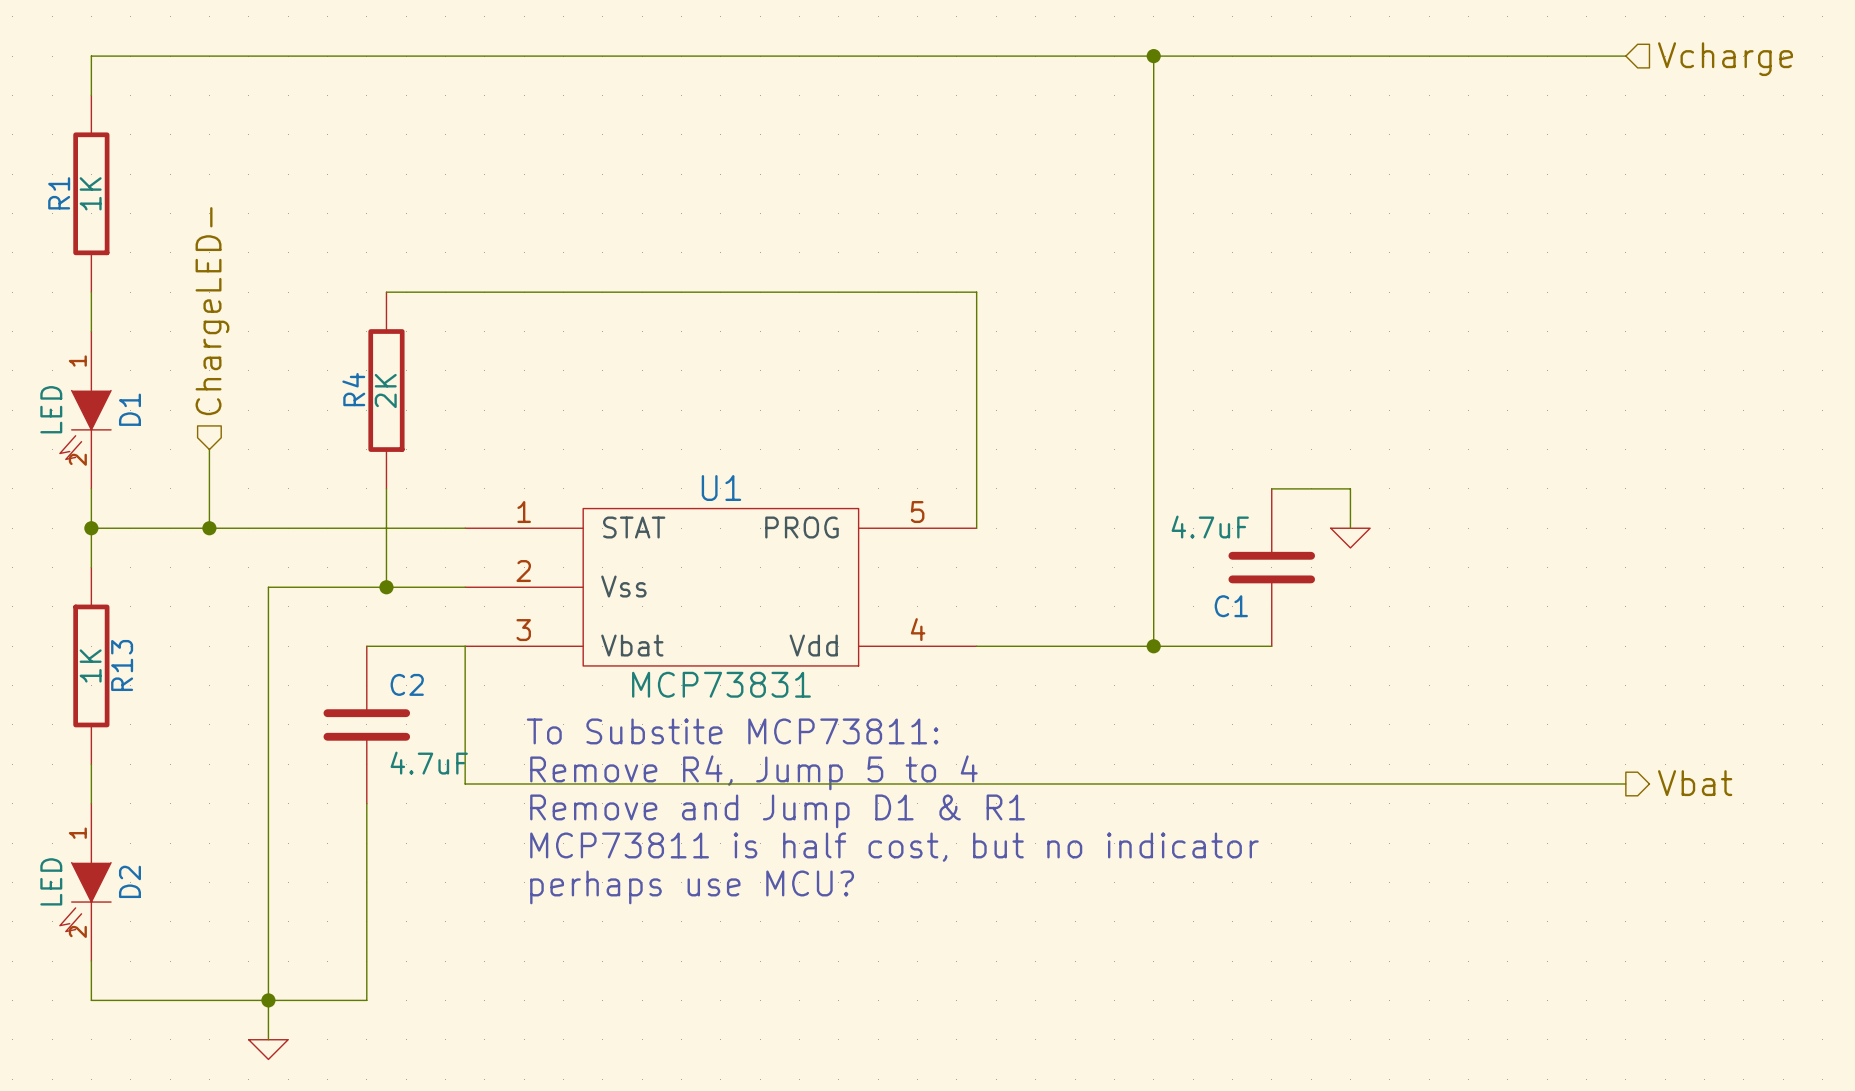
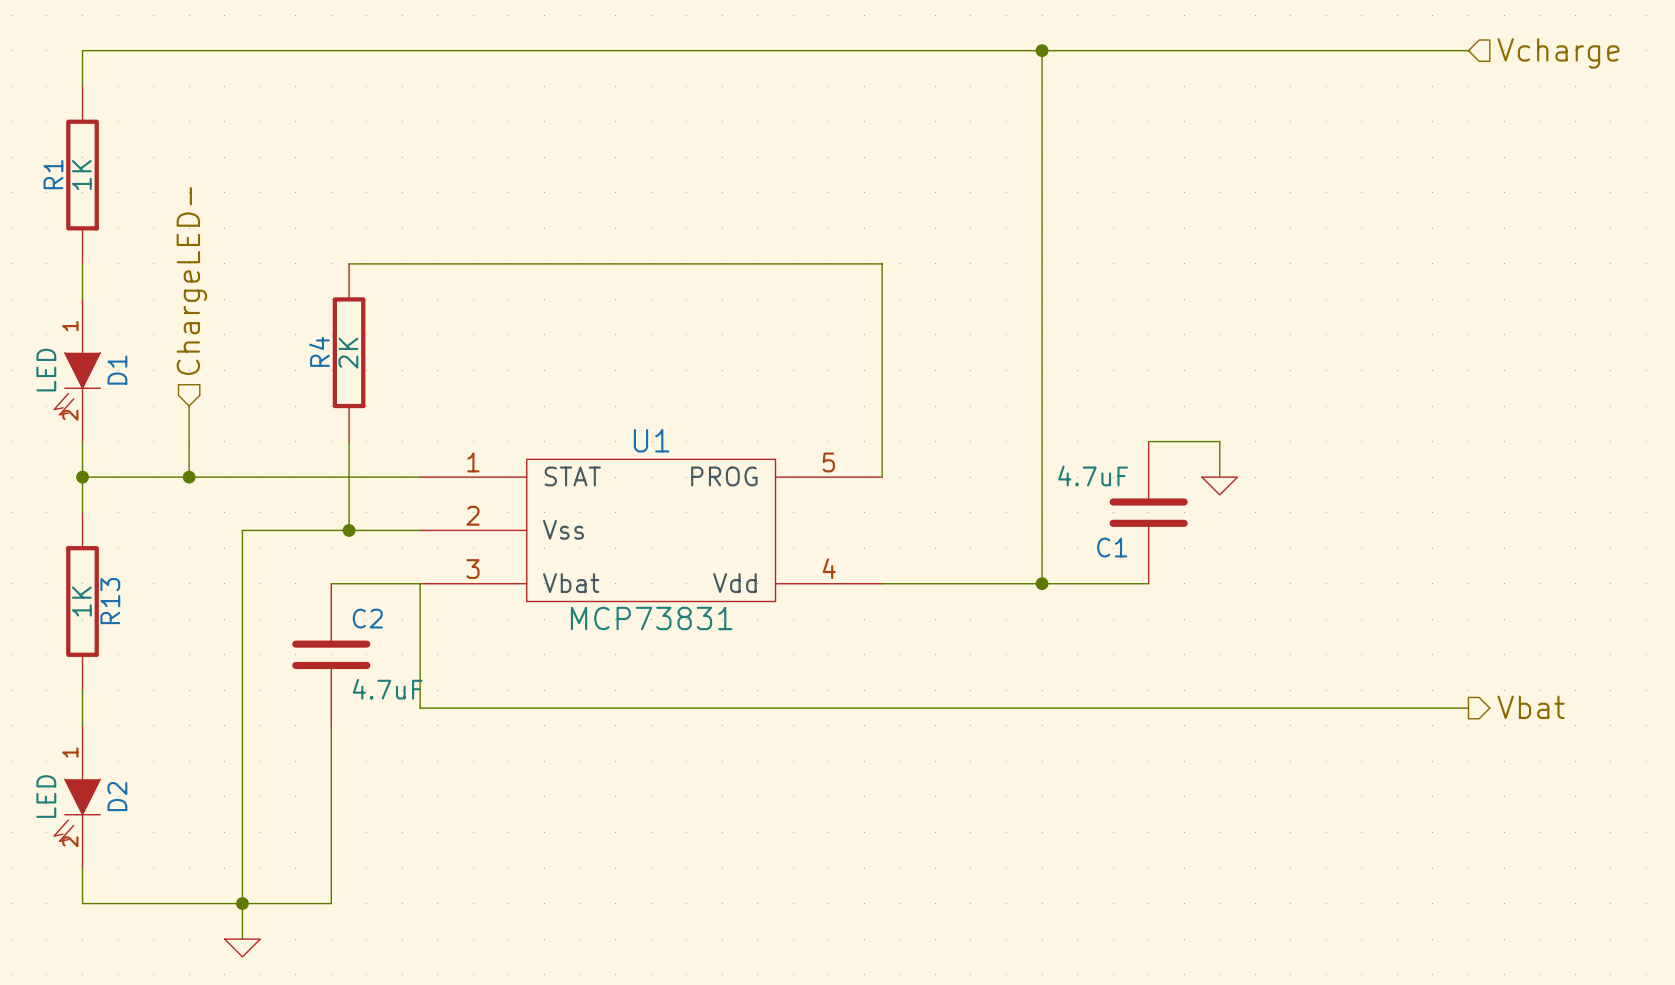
text: To Substite MCP73811: (732, 731) -> none
text: Remove R4, Jump 5 to 4 (753, 772) -> none
text: Remove and Jump D1 & R1 (777, 811) -> none
text: MCP73811 is half cost, but no indicator (894, 847) -> none
text: perhaps use MCU? (692, 887) -> none

